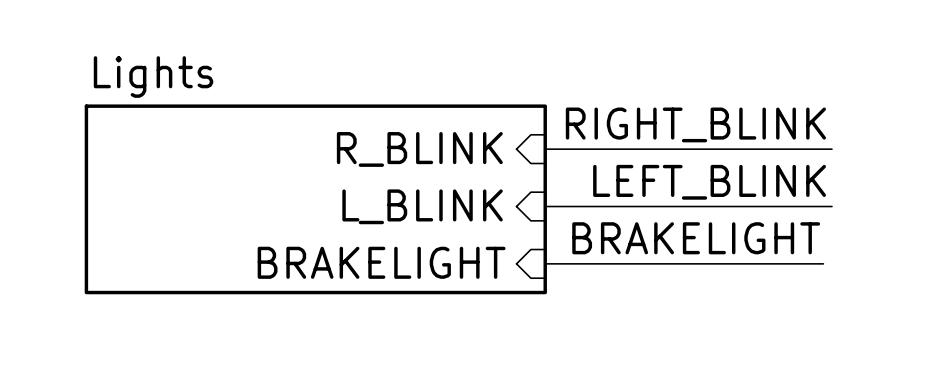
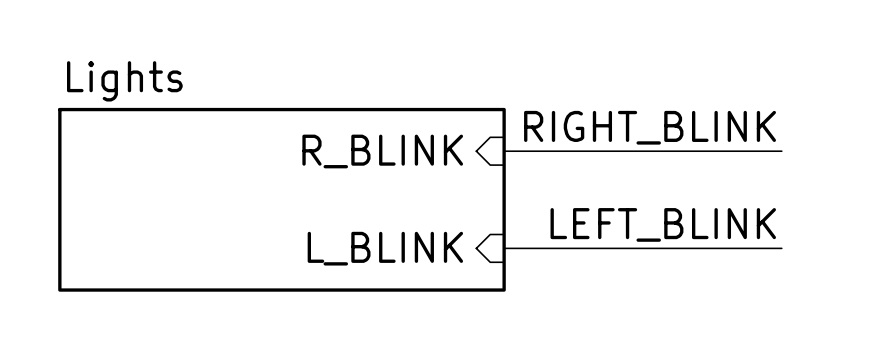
label position: LEFT_BLINK (709, 182) -> LEFT_BLINK (663, 224)
sheet pin position: L_BLINK (422, 206) -> L_BLINK (385, 248)
wire: (545, 206) (831, 206) -> (504, 248) (781, 248)
label: BRAKELIGHT (696, 238) -> none
sheet pin: BRAKELIGHT (381, 262) -> none
wire: (545, 263) (823, 263) -> none

